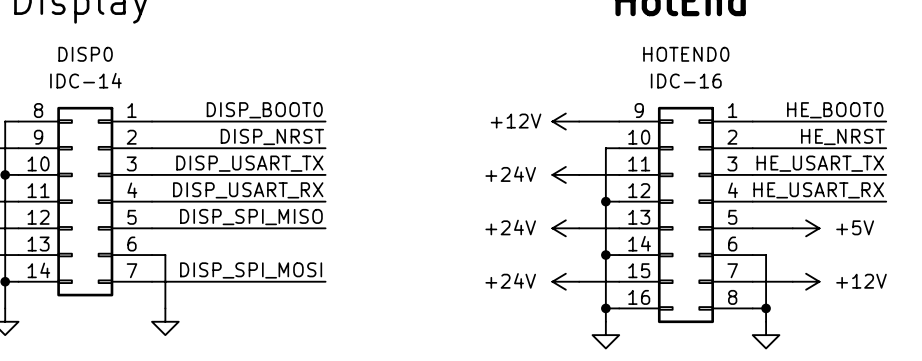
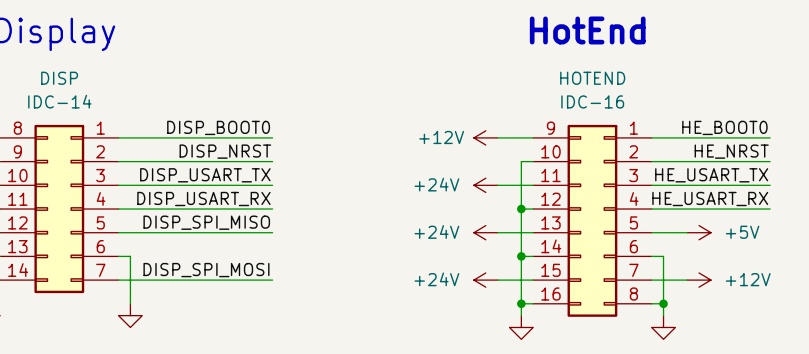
DISP0 name: DISP0 (85, 54) -> DISP (59, 78)
HOTEND0 name: HOTEND0 (686, 54) -> HOTEND (592, 78)

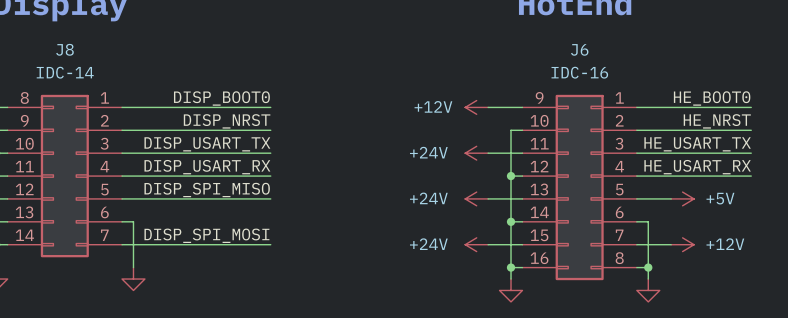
DISP name: DISP (59, 78) -> J8 (64, 49)
HOTEND name: HOTEND (592, 78) -> J6 (579, 49)

